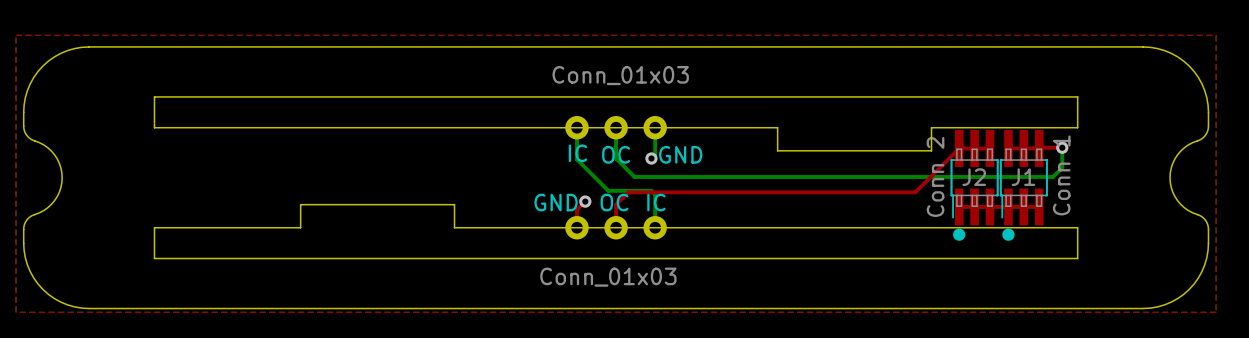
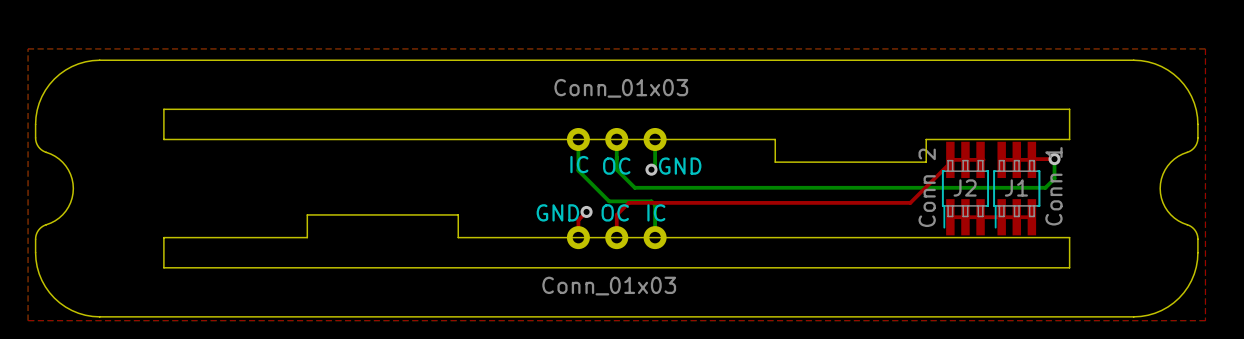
J2 footprint: [950, 130, 999, 241] -> [941, 141, 990, 236]
J1 footprint: [999, 130, 1048, 241] -> [993, 141, 1041, 236]

